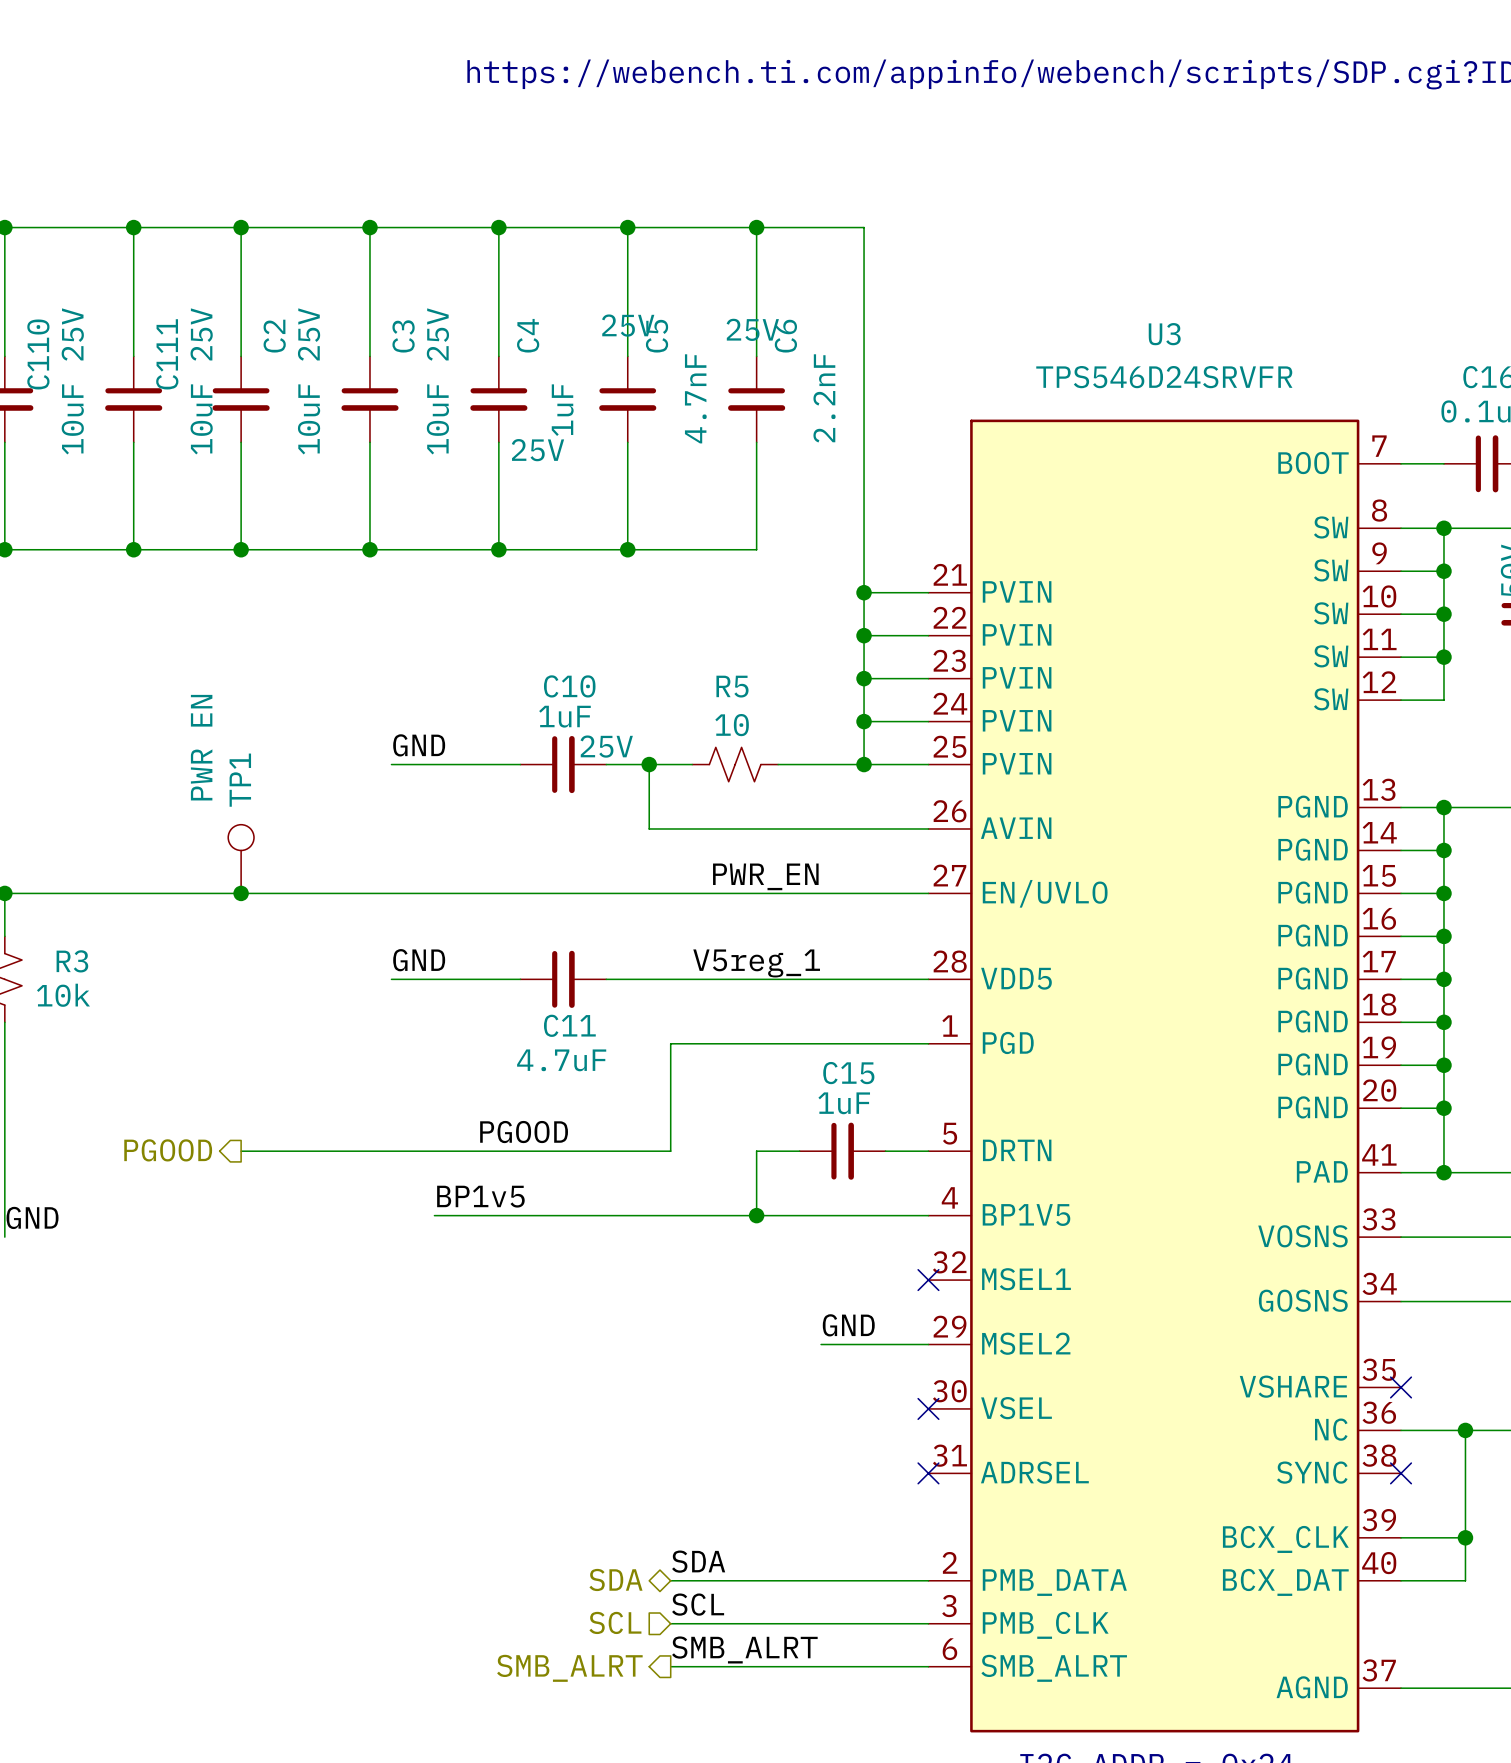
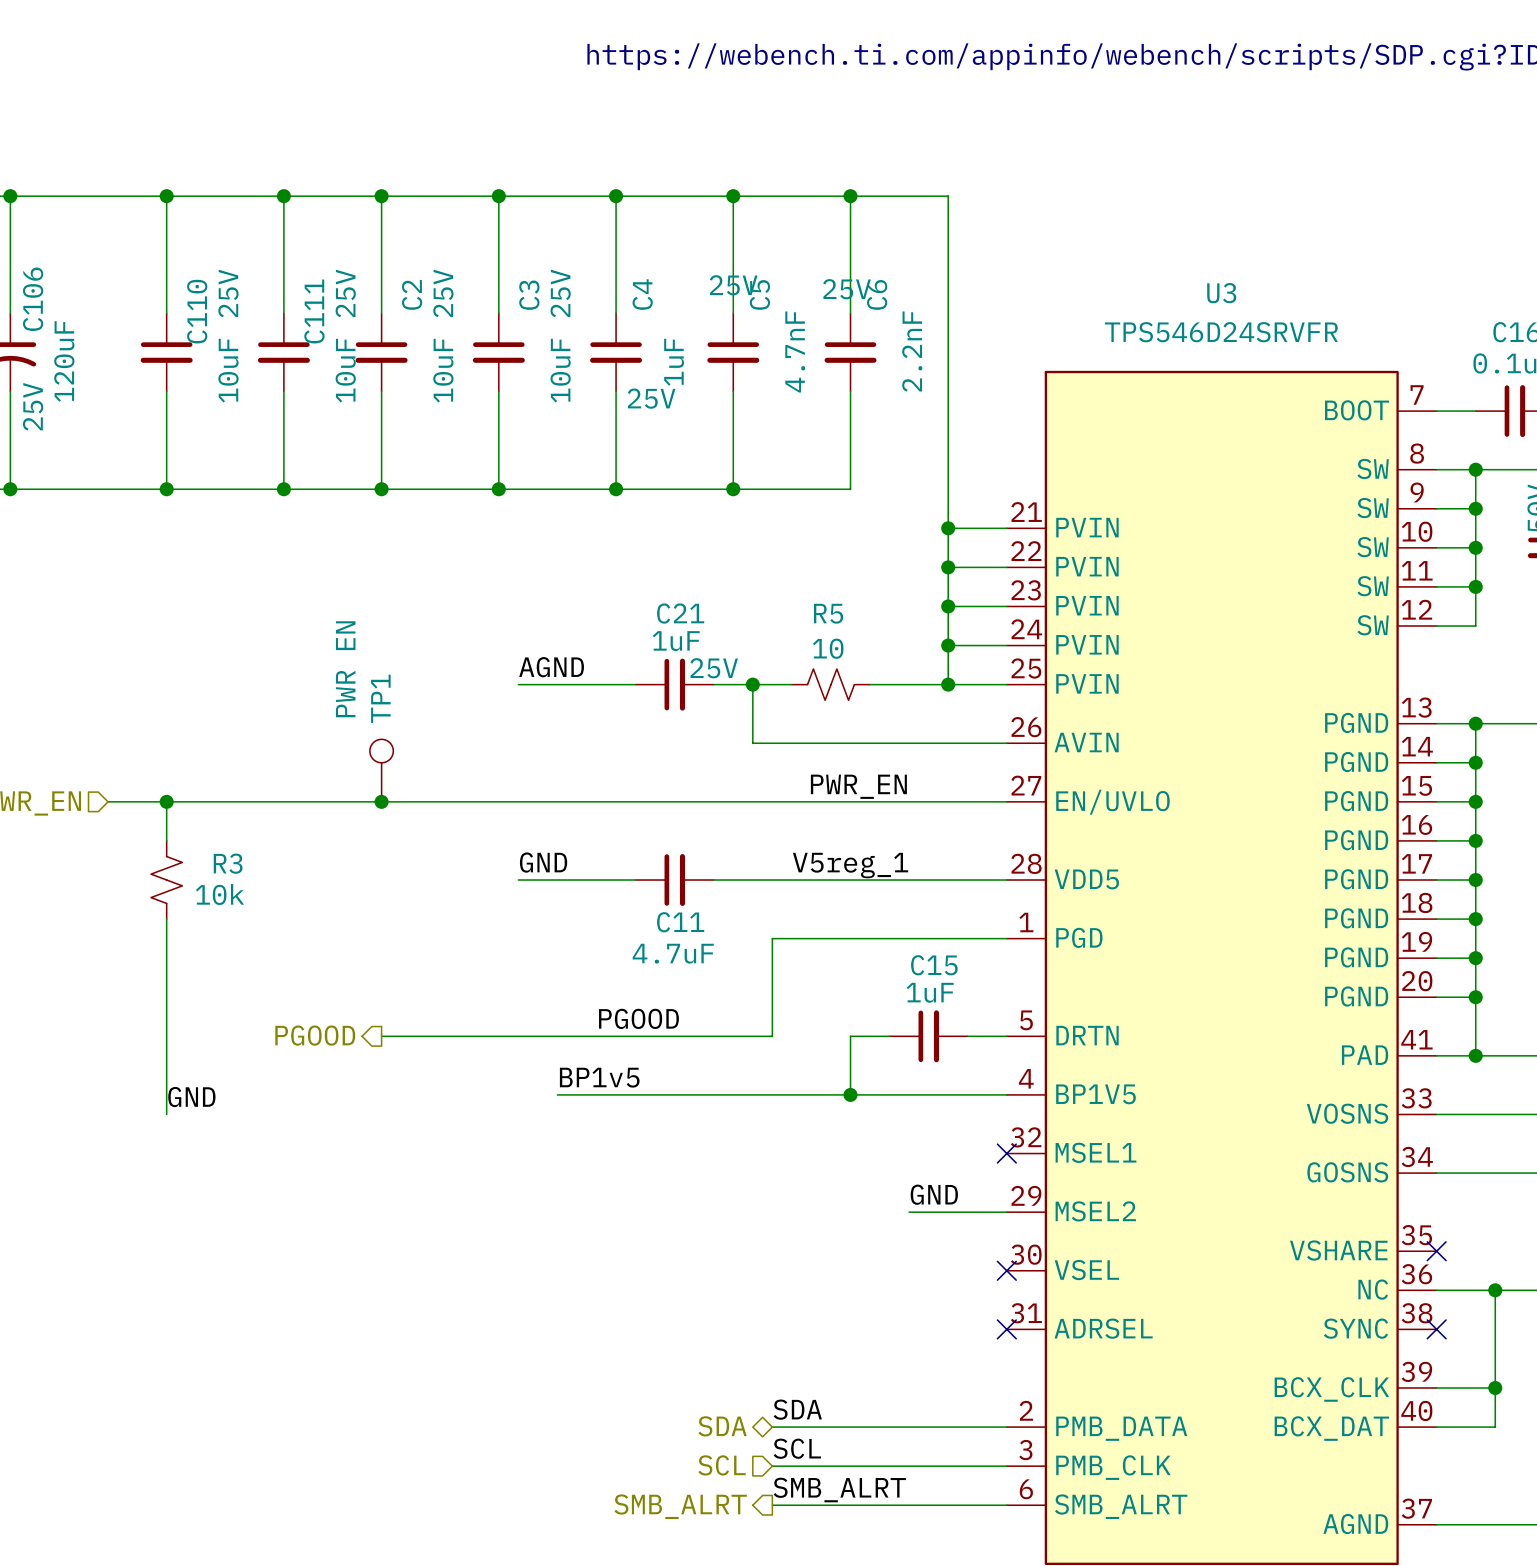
C10 name: C10 (569, 686) -> C21 (680, 613)
label: GND (419, 745) -> AGND (551, 667)

